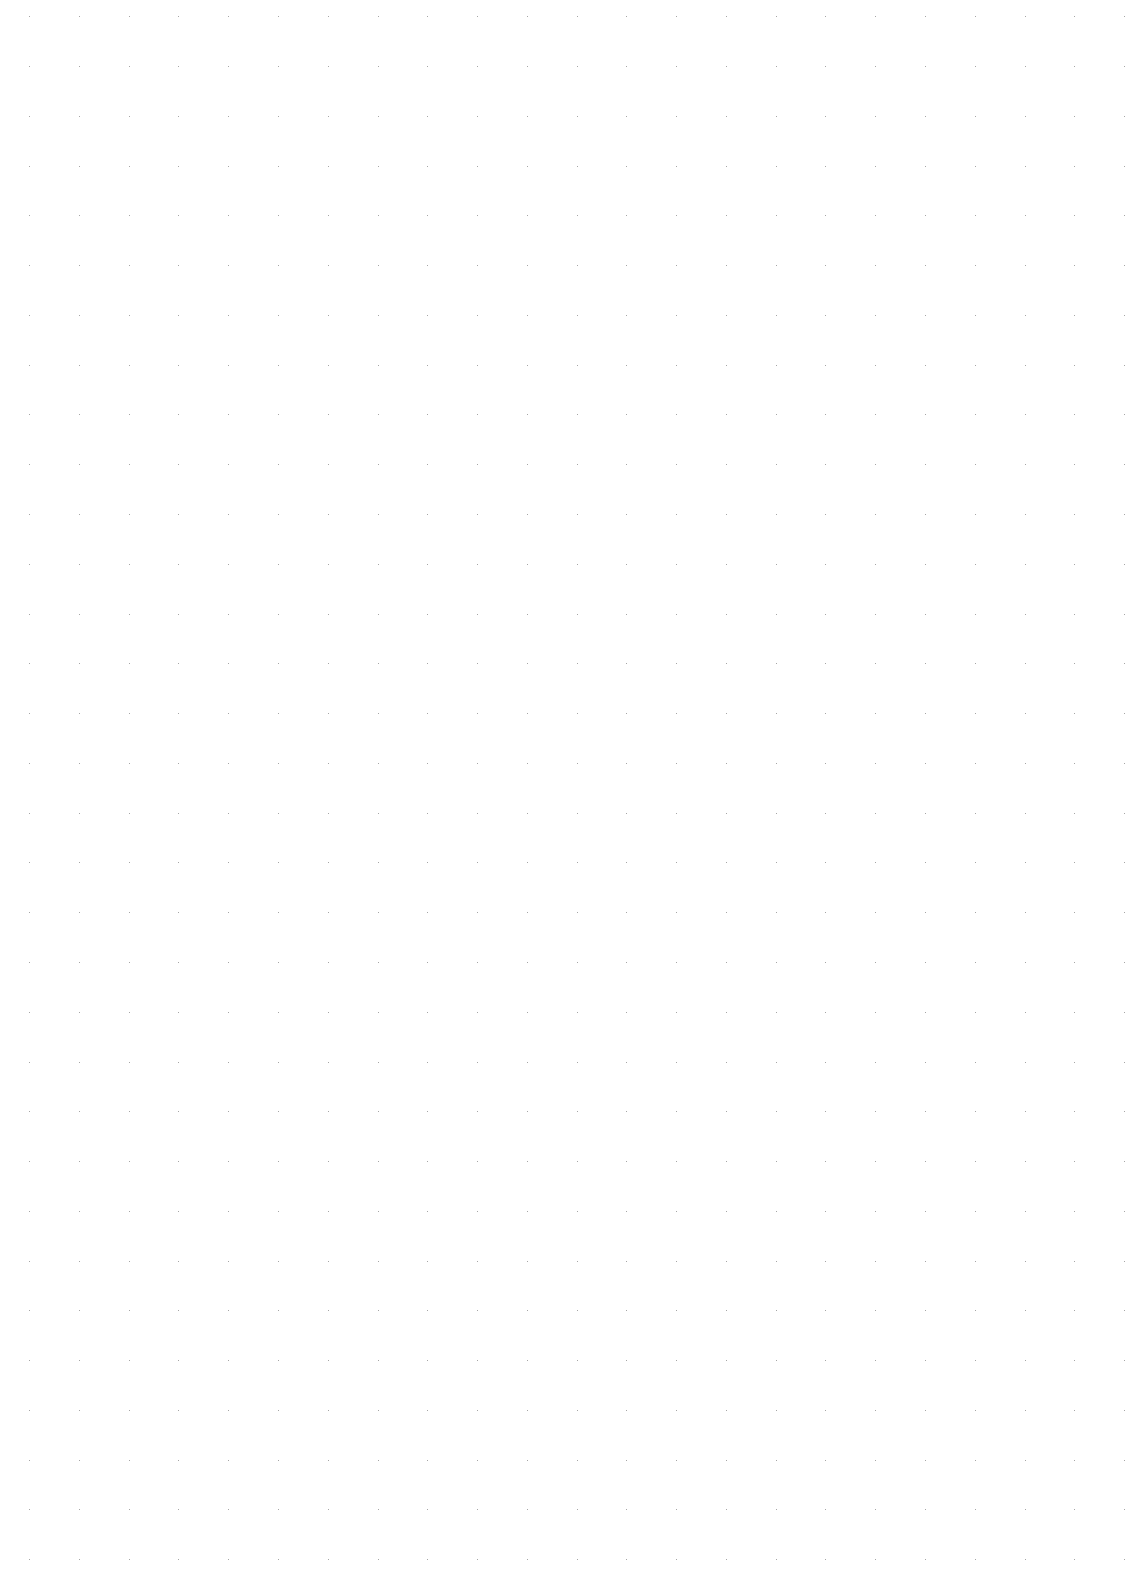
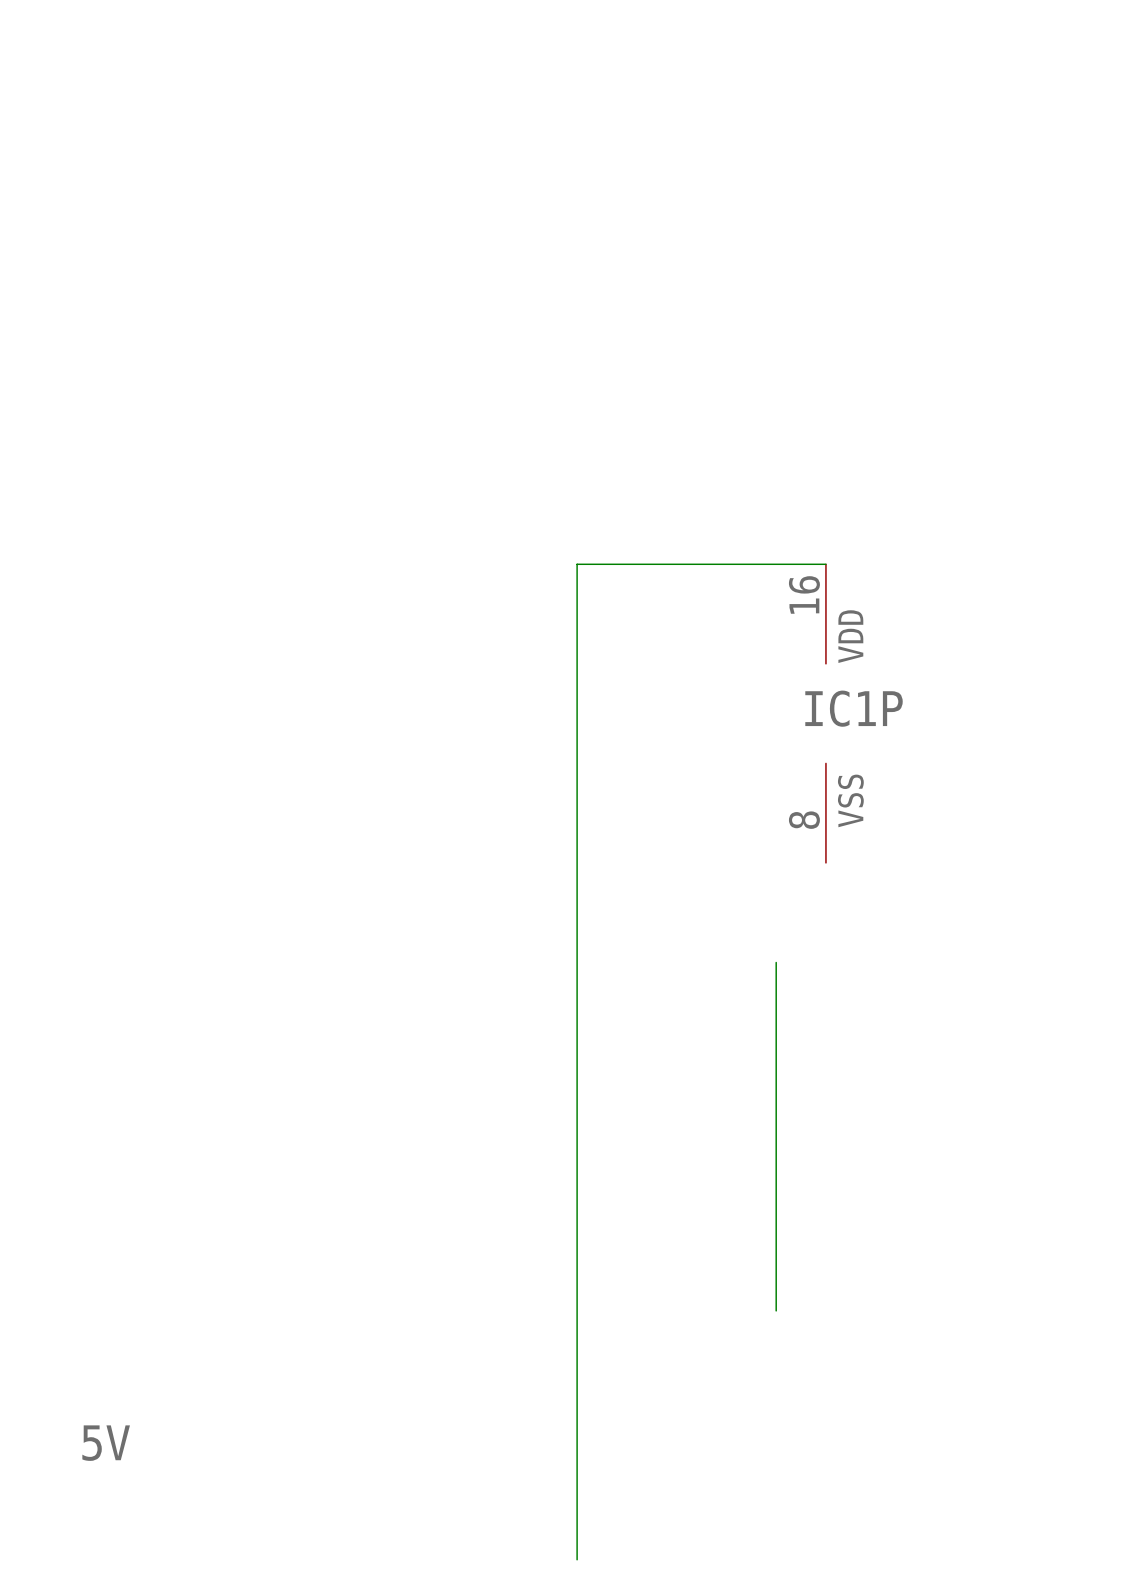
wire: none -> (825, 564) (577, 564) (577, 1559)
IC1P: none -> (825, 713)
wire: none -> (776, 962) (776, 1310)
label: none -> 5V (106, 1443)

